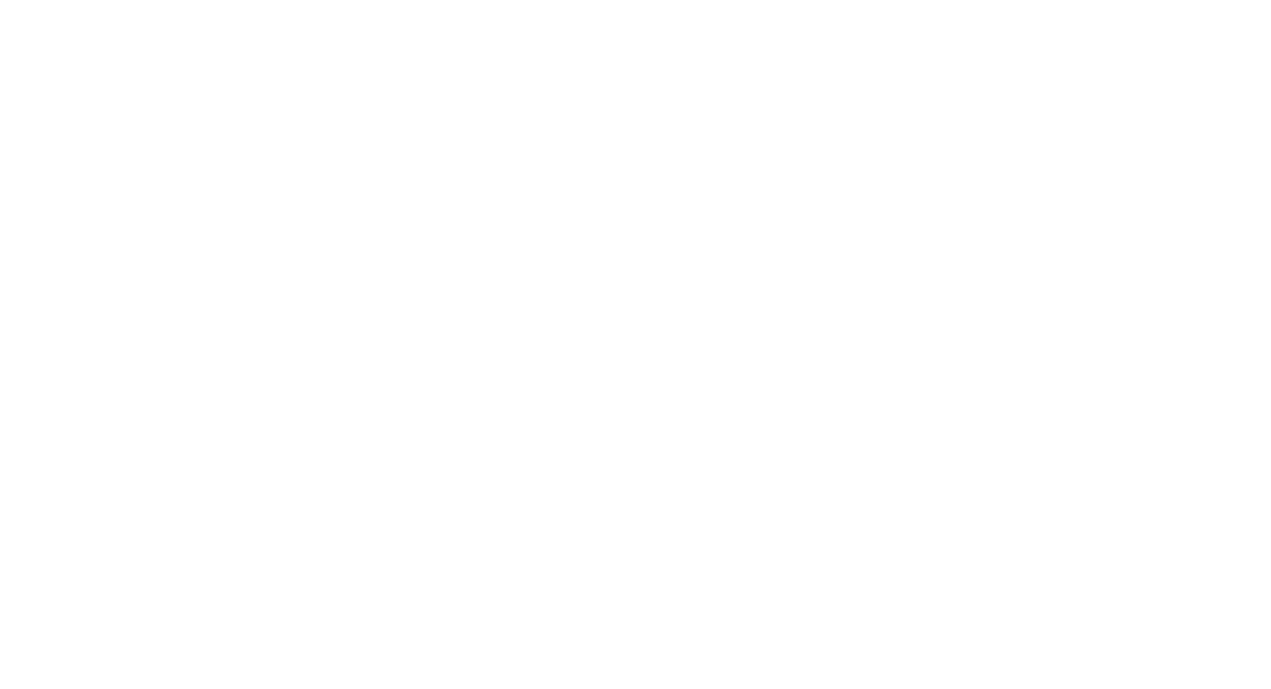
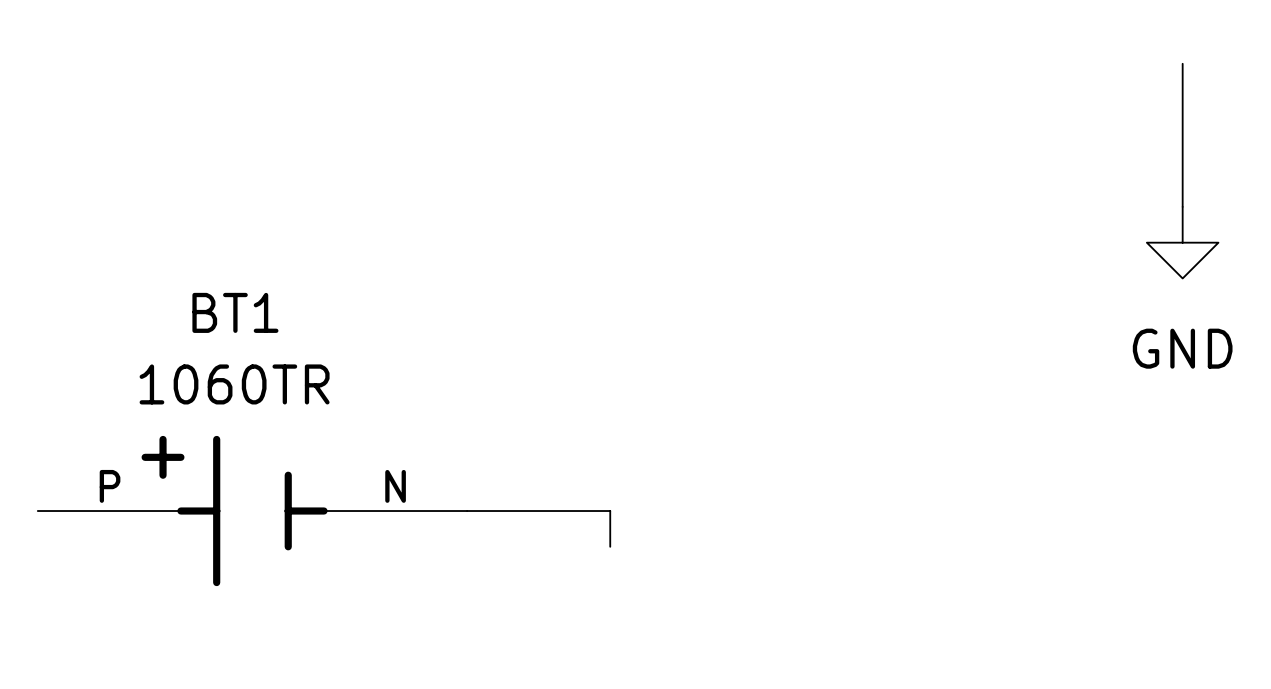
wire: none -> (1182, 63) (1182, 206)
power symbol: none -> GND (1182, 242)
BT1: none -> 1060TR (252, 511)
wire: none -> (467, 511) (610, 511) (610, 546)

